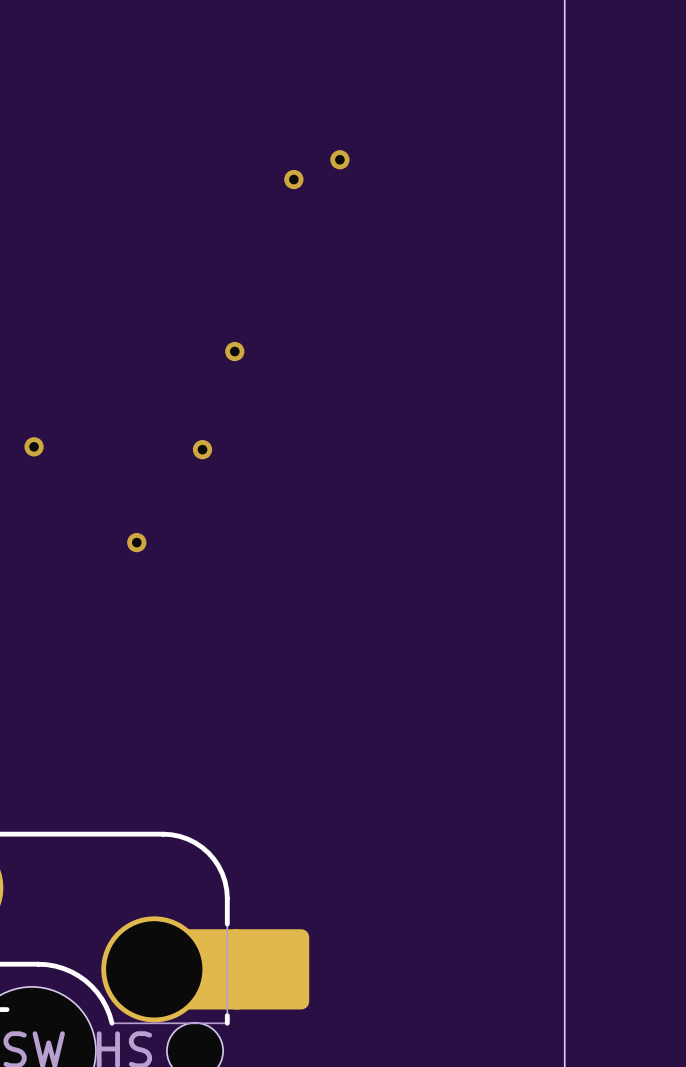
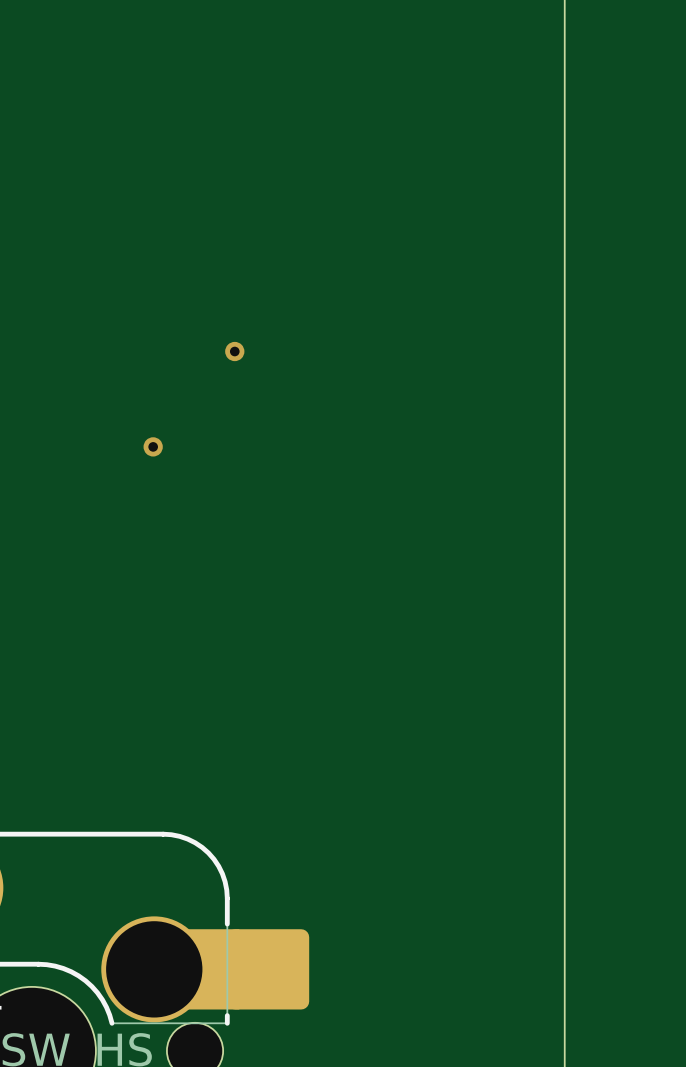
via: (339, 159) -> none
via: (293, 179) -> none
via: (34, 446) -> none
via: none -> (153, 446)
via: (202, 449) -> none
via: (136, 542) -> none

